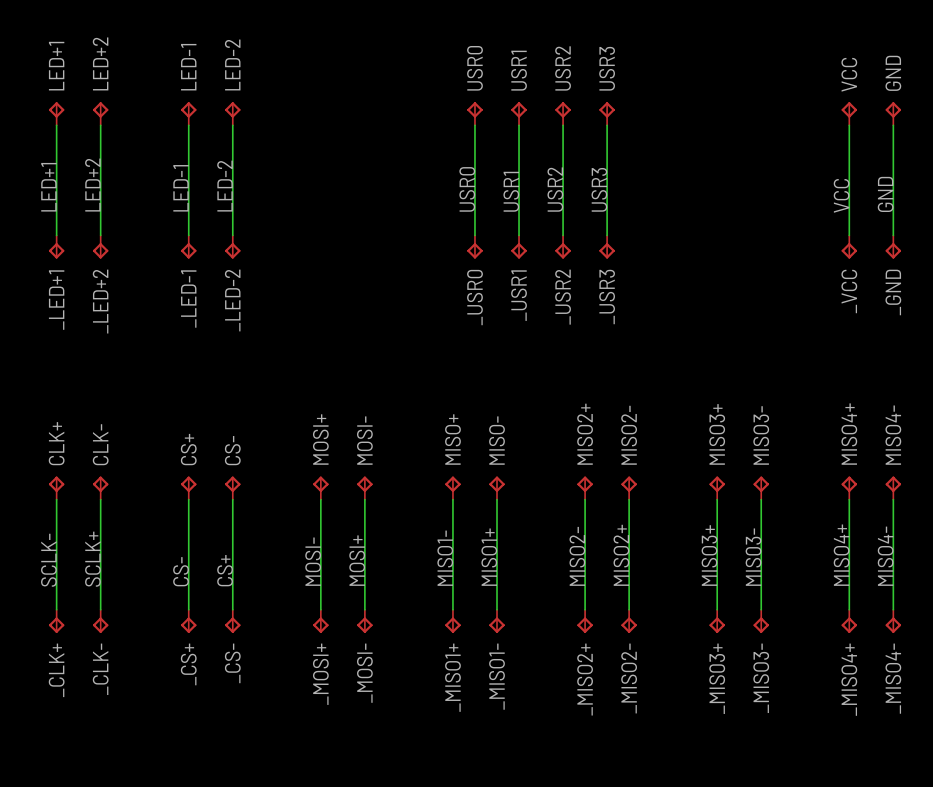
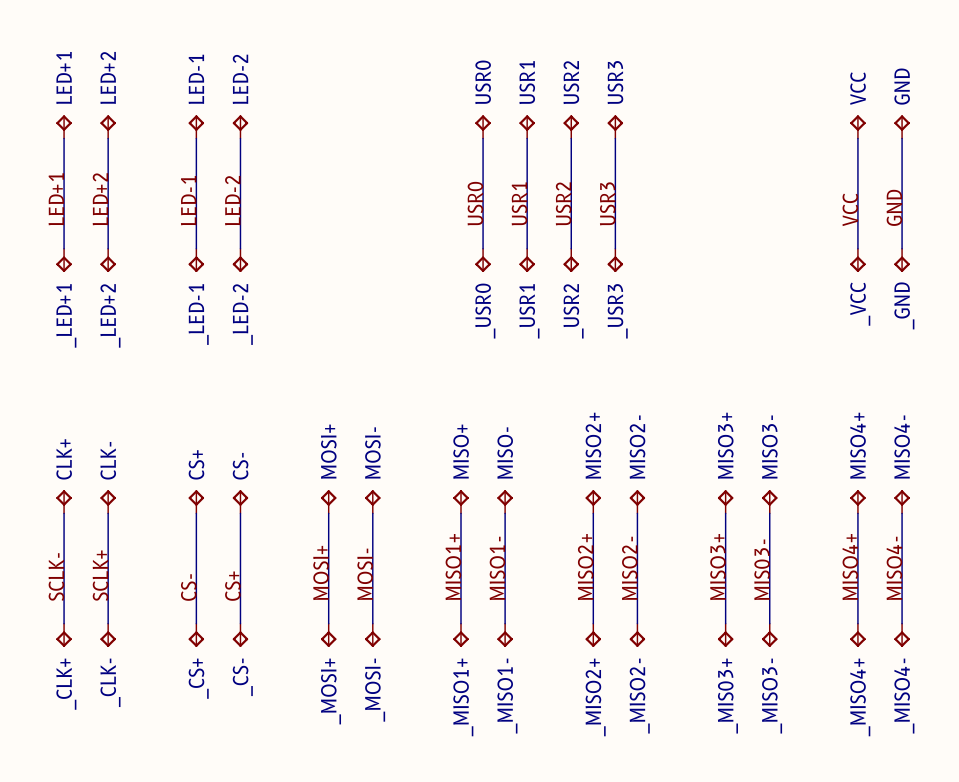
label: MISO2+ (621, 555) -> MISO2- (629, 568)
label: MISO2- (577, 556) -> MISO2+ (585, 567)
label: MISO1+ (489, 557) -> MISO1- (497, 568)
label: MISO1- (445, 558) -> MISO1+ (453, 567)
label: MOSI+ (357, 560) -> MOSI- (365, 574)
label: MOSI- (313, 561) -> MOSI+ (321, 572)

